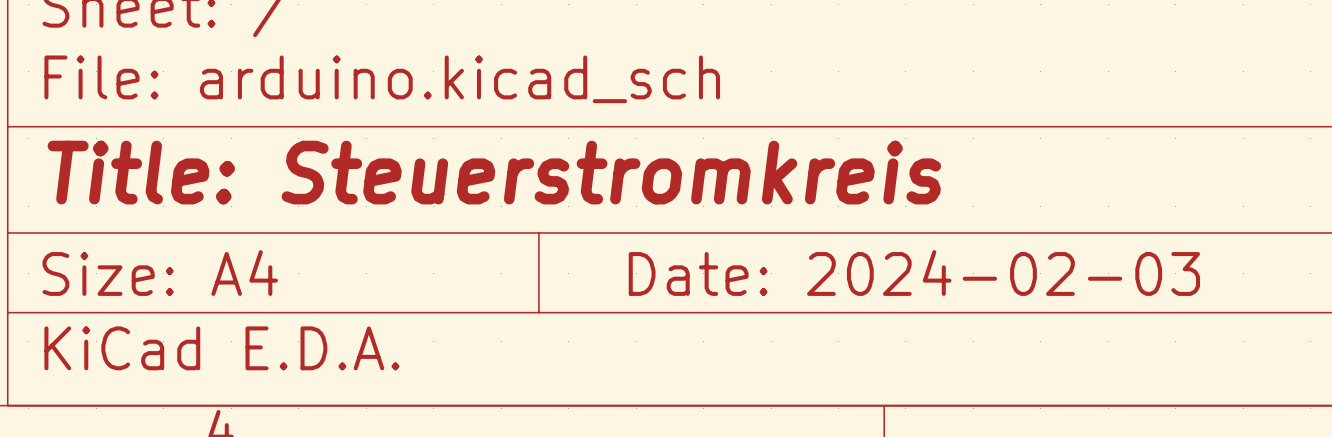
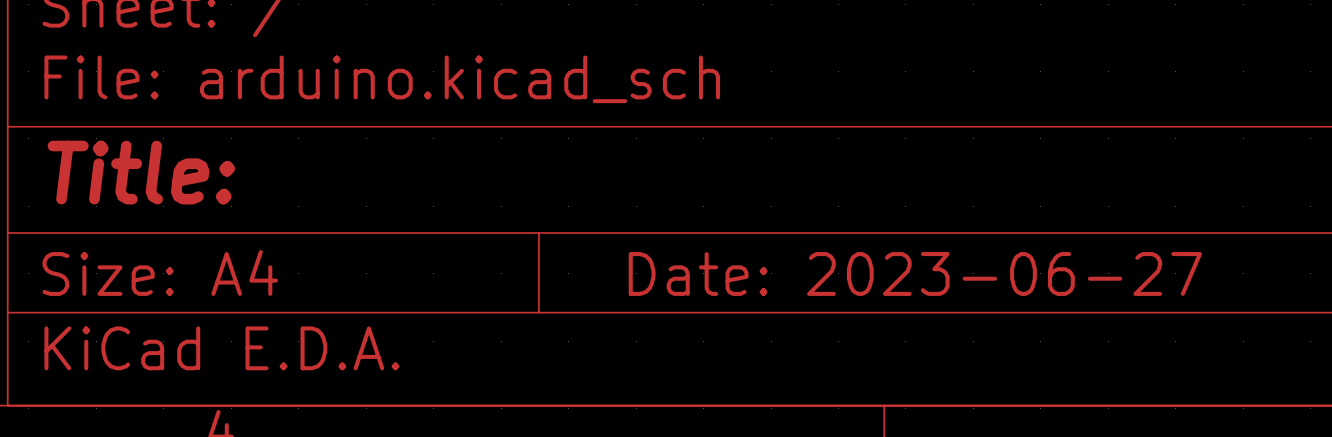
title block: Title: Steuerstromkreis (494, 172) -> Title: (141, 172)
title block: Date: 2024-02-03 (914, 273) -> Date: 2023-06-27 (915, 273)

